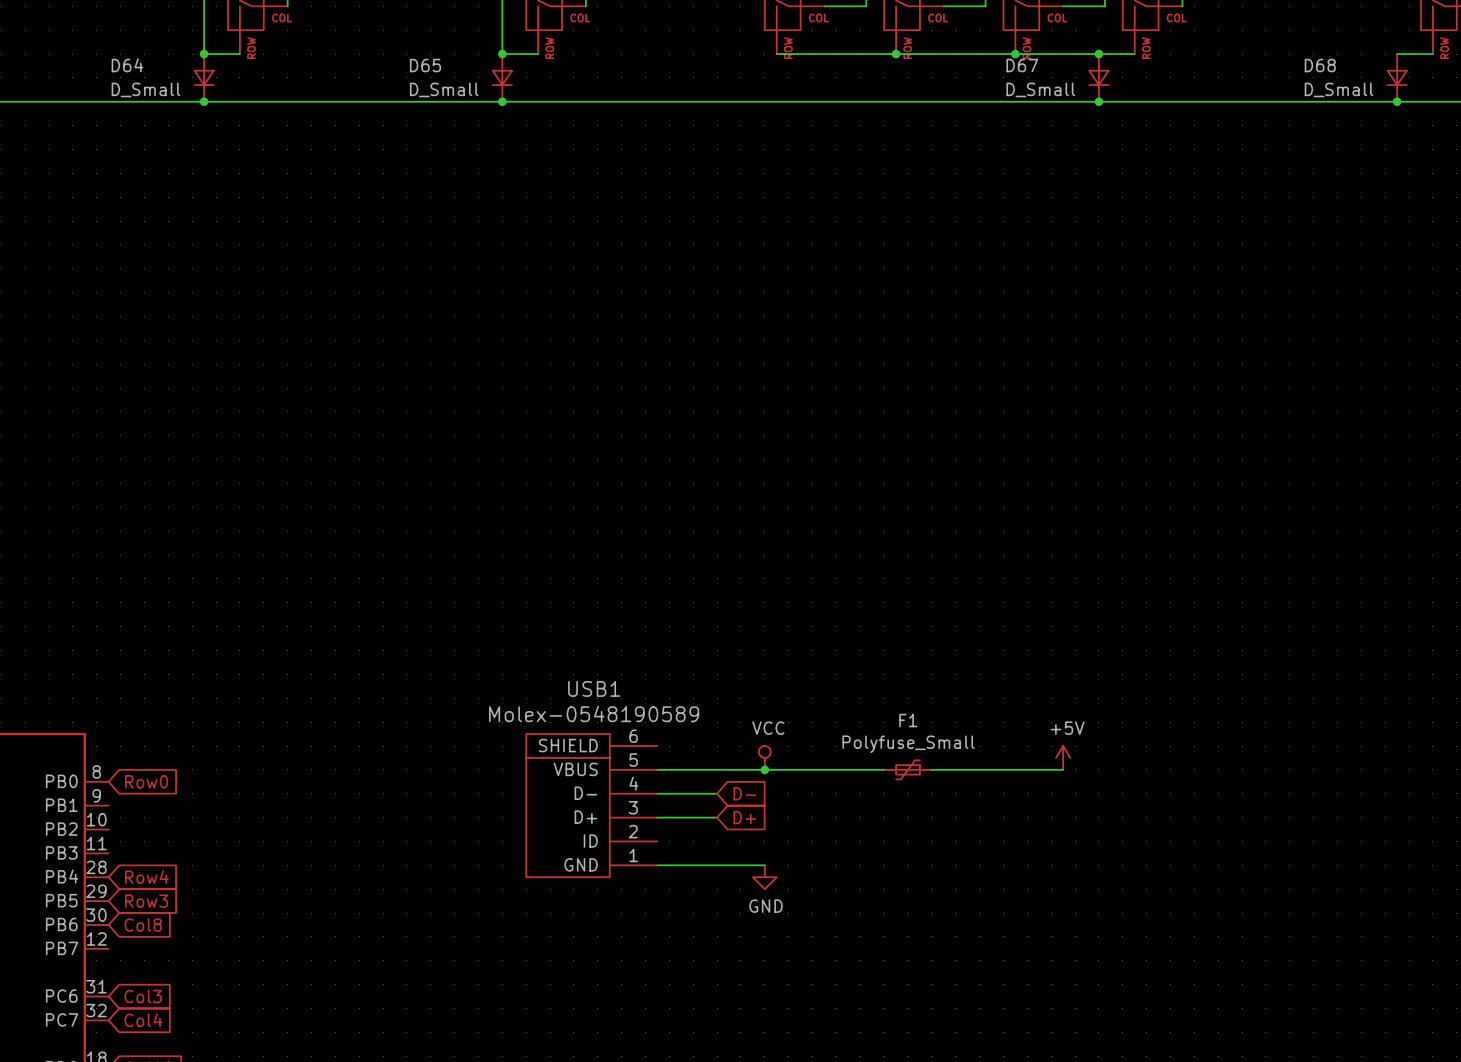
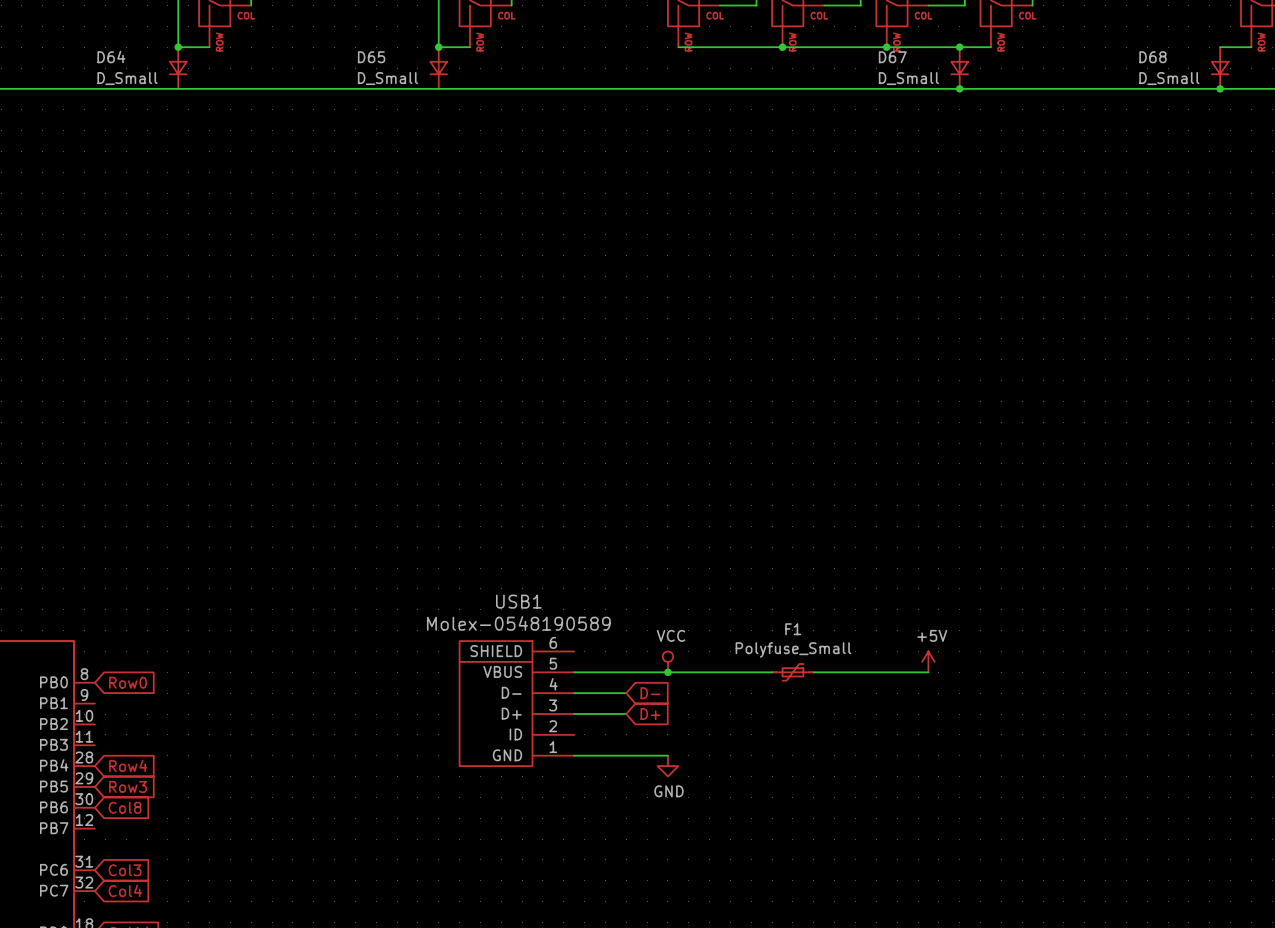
junction: (204, 101) -> none
junction: (502, 101) -> none

